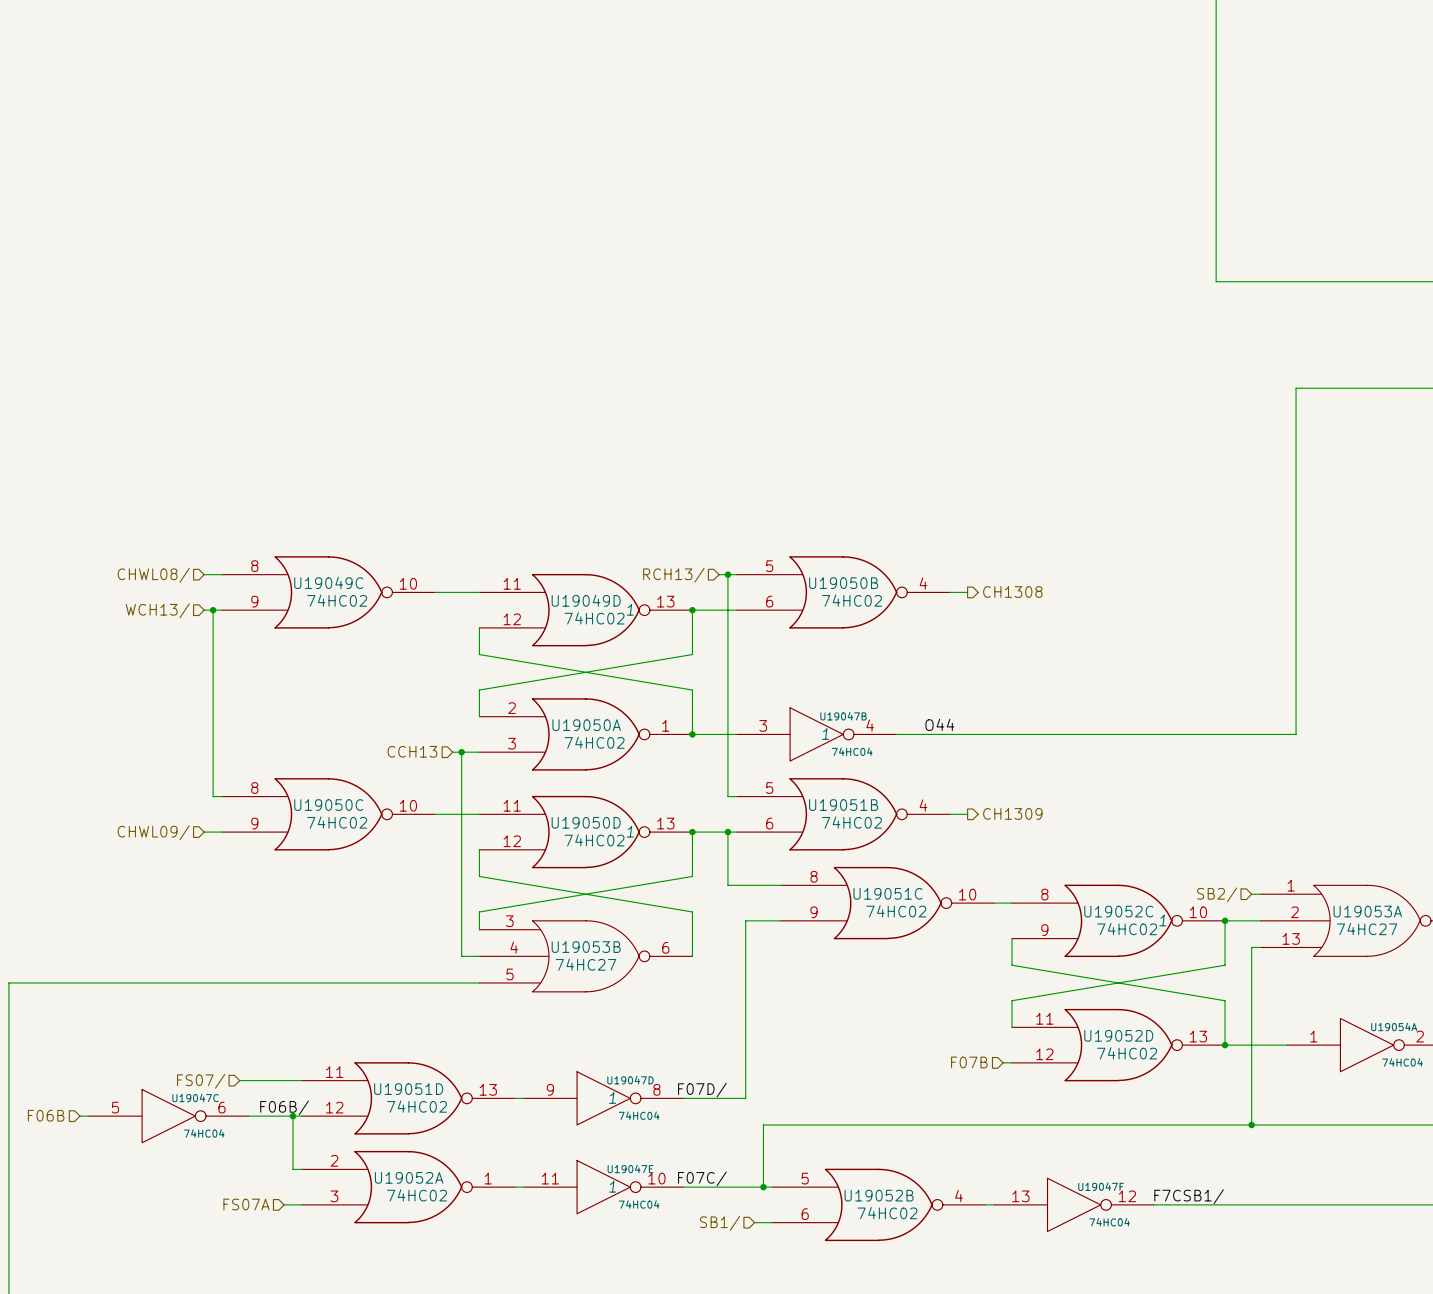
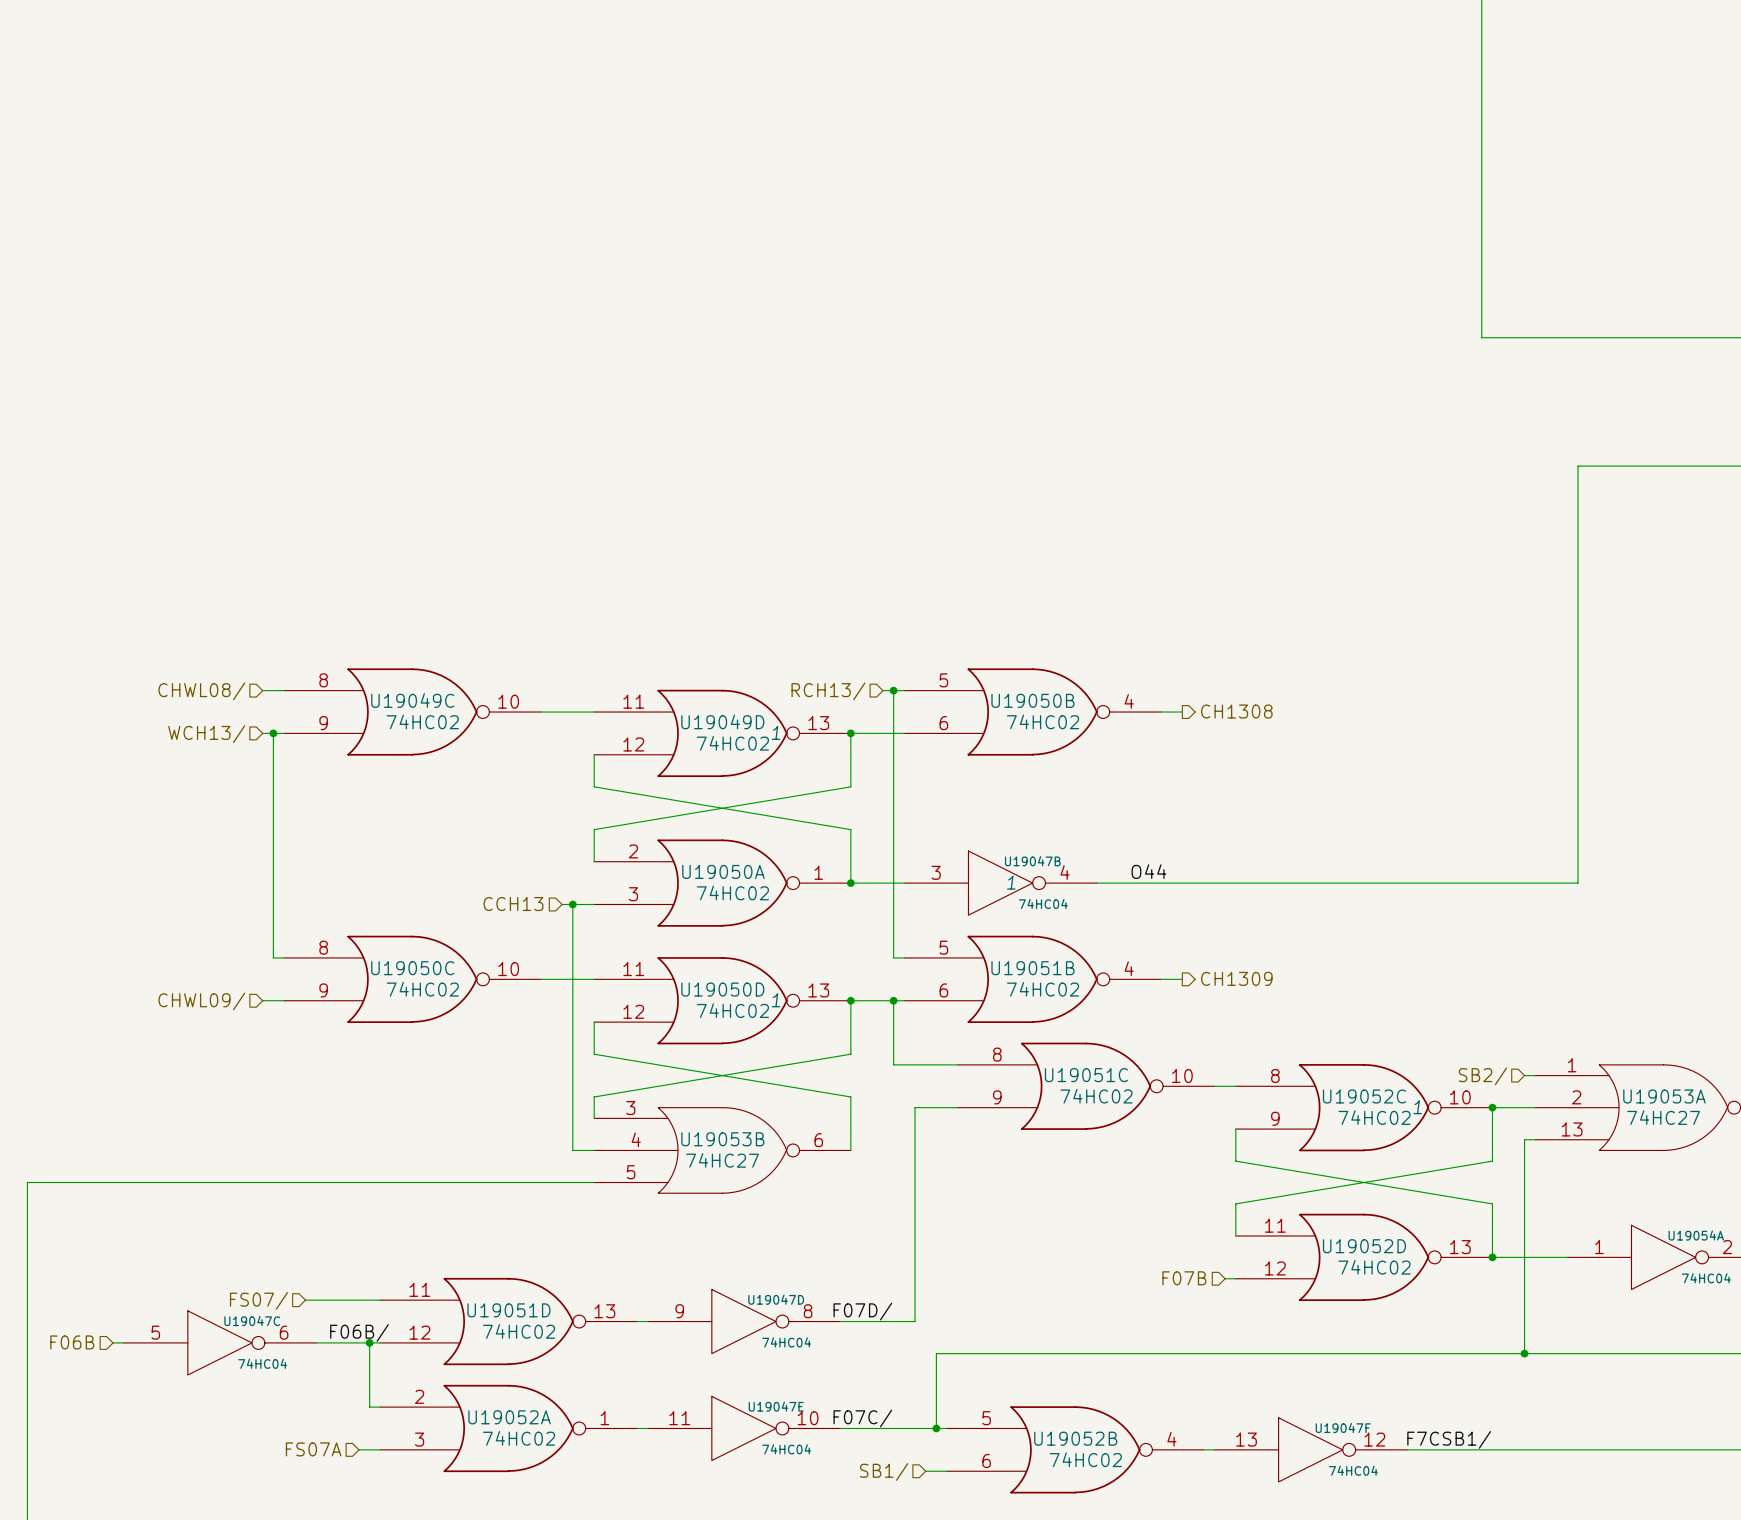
U19047D text: 1 (612, 1097) -> none
U19047E text: 1 (612, 1186) -> none

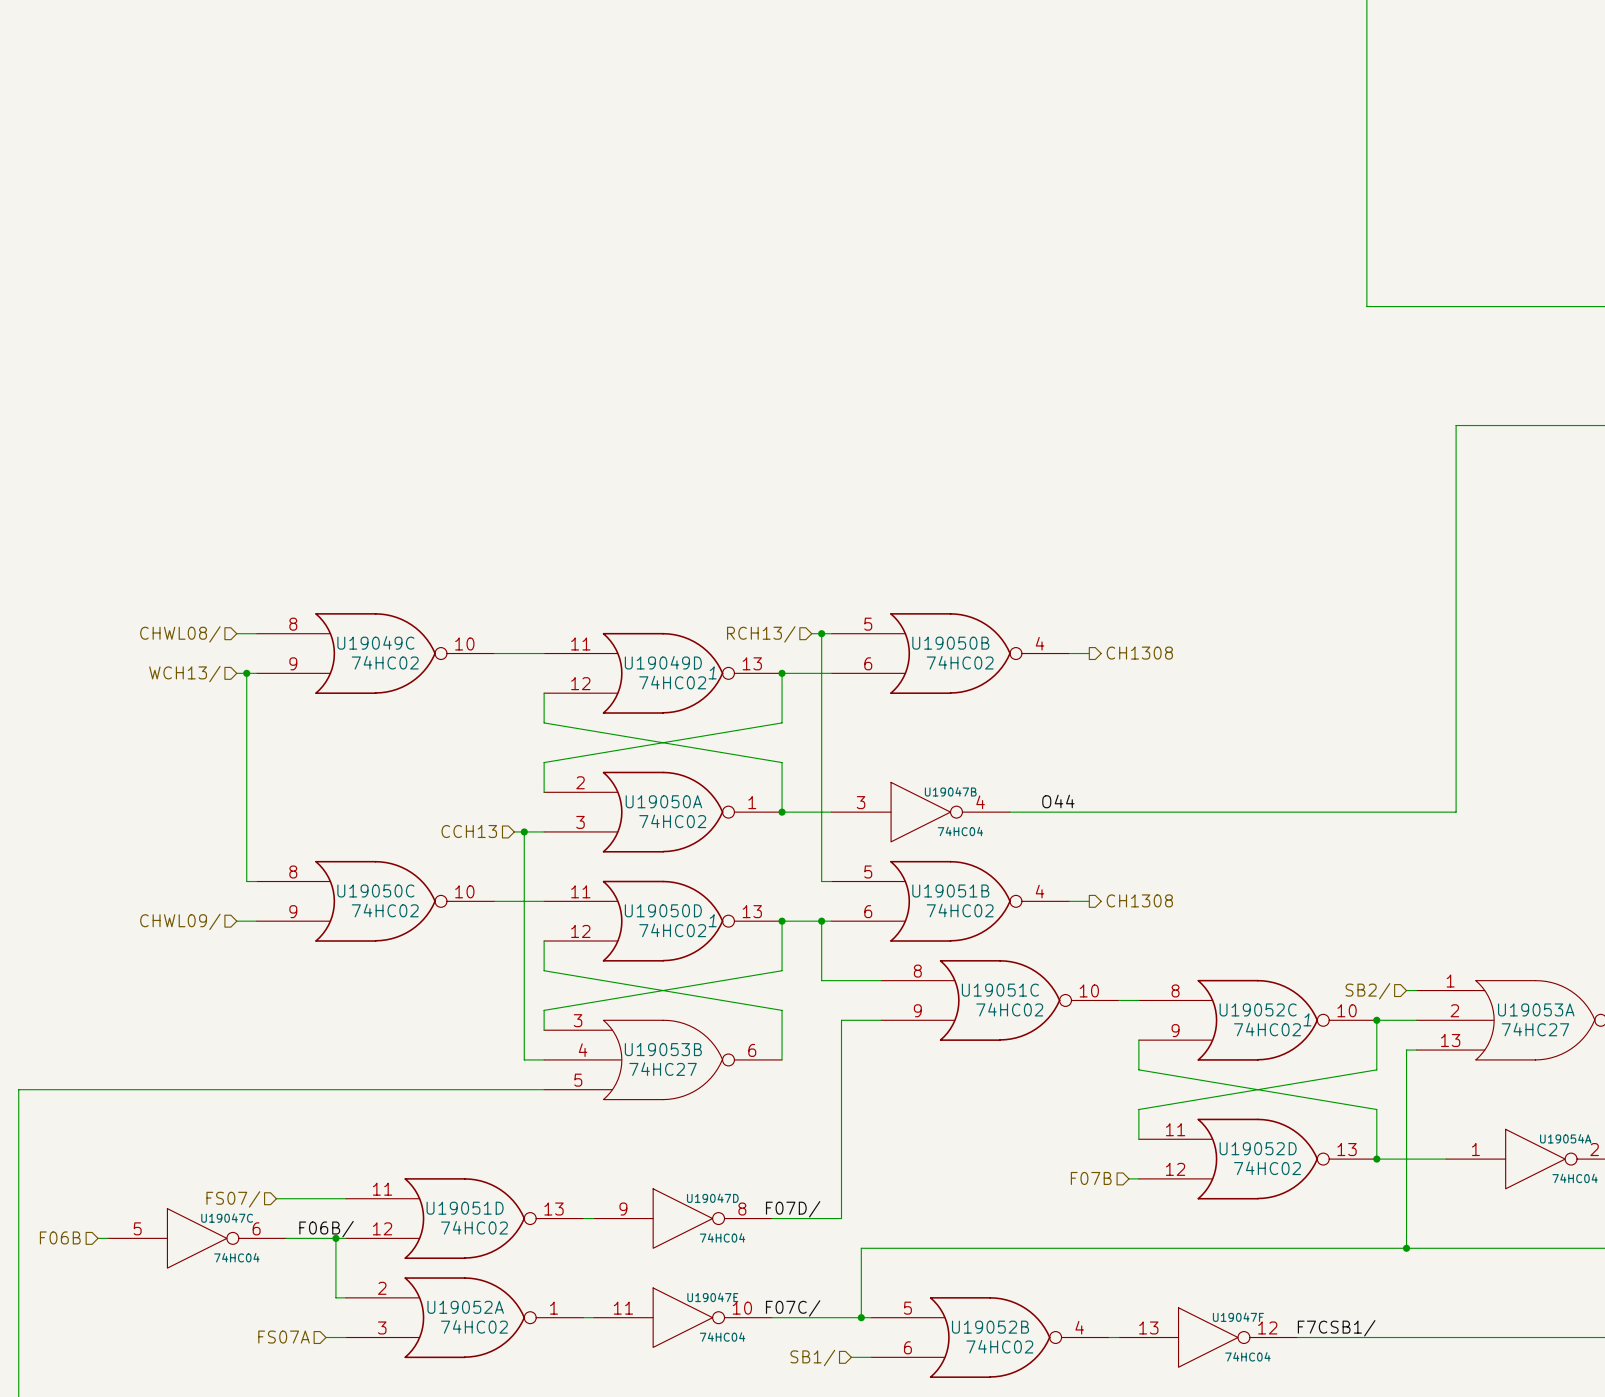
U19047B text: 1 (1011, 882) -> none
hierarchical label: CH1309 (1236, 978) -> CH1308 (1139, 900)

